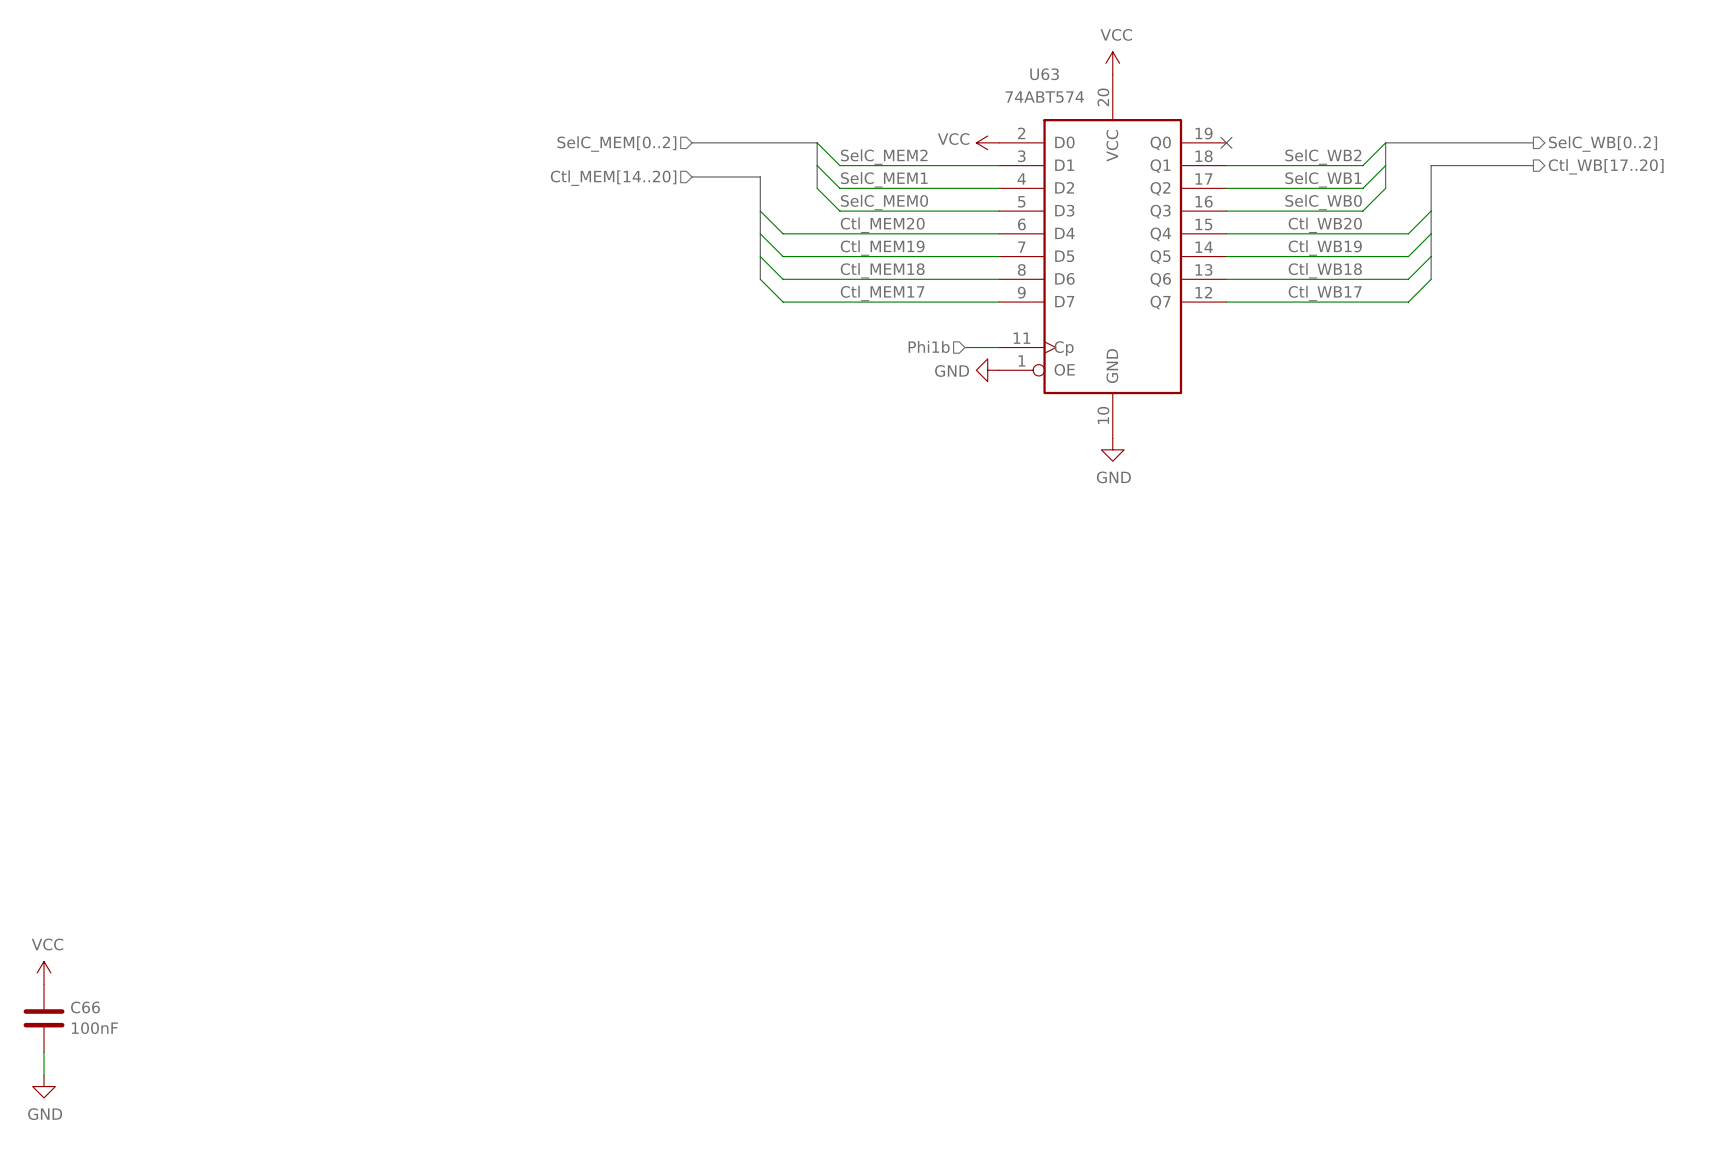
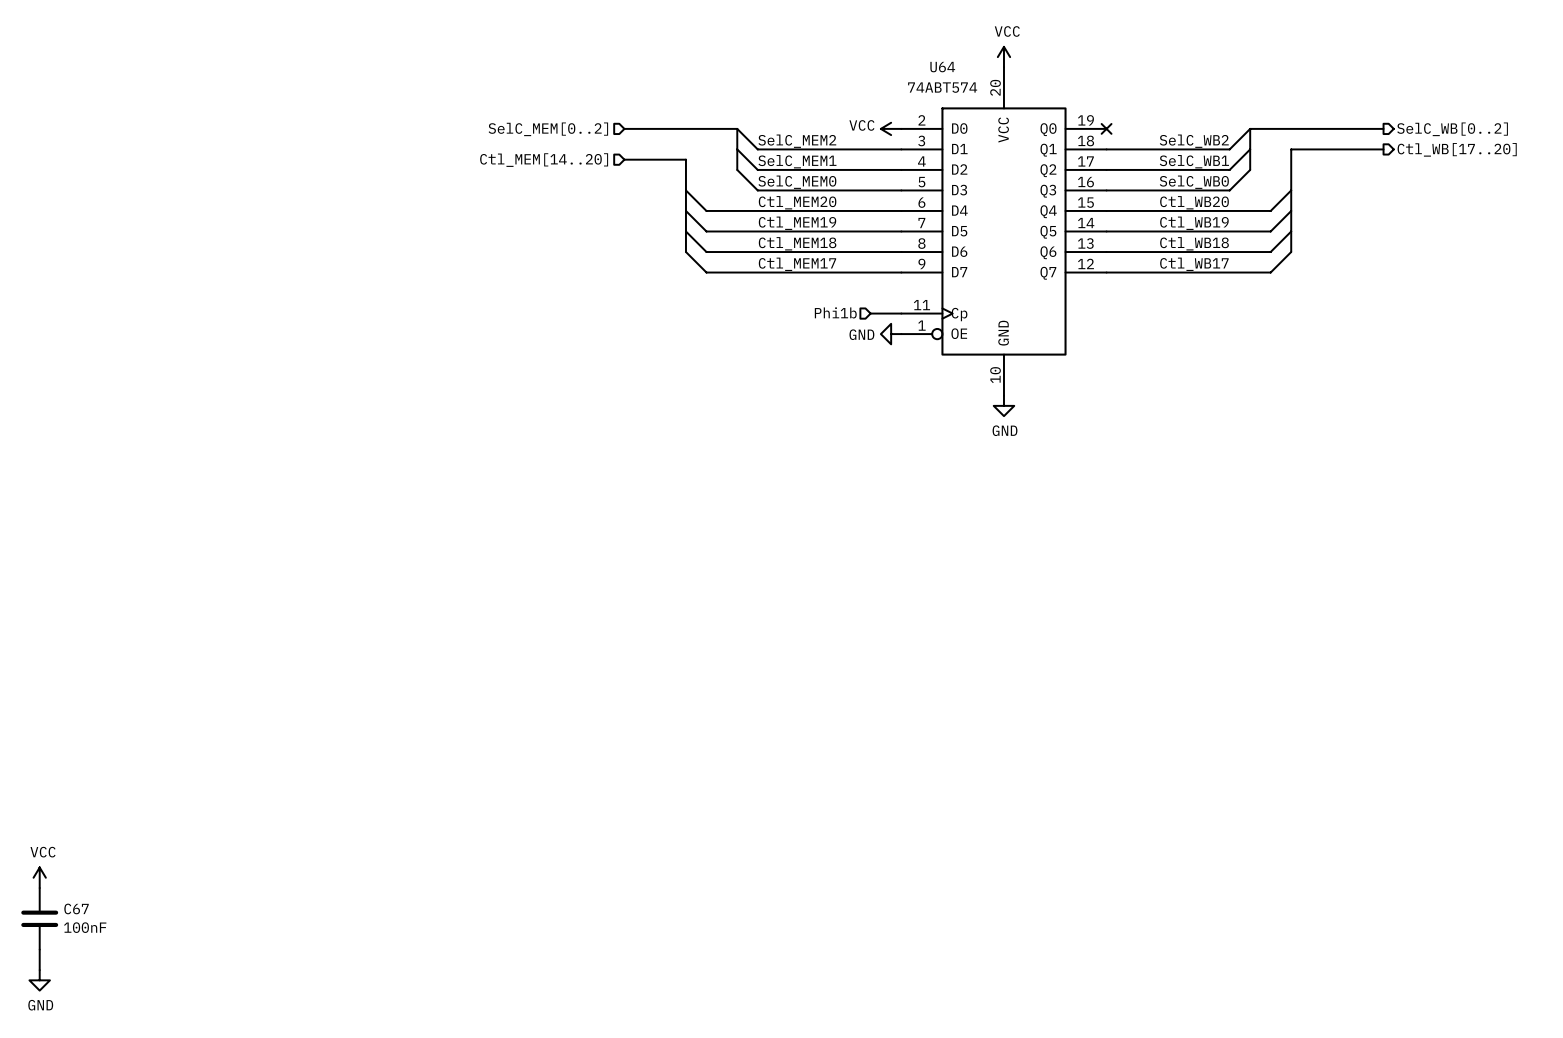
U63 name: U63 (1044, 74) -> U64 (942, 67)
C66 name: C66 (85, 1007) -> C67 (76, 908)

